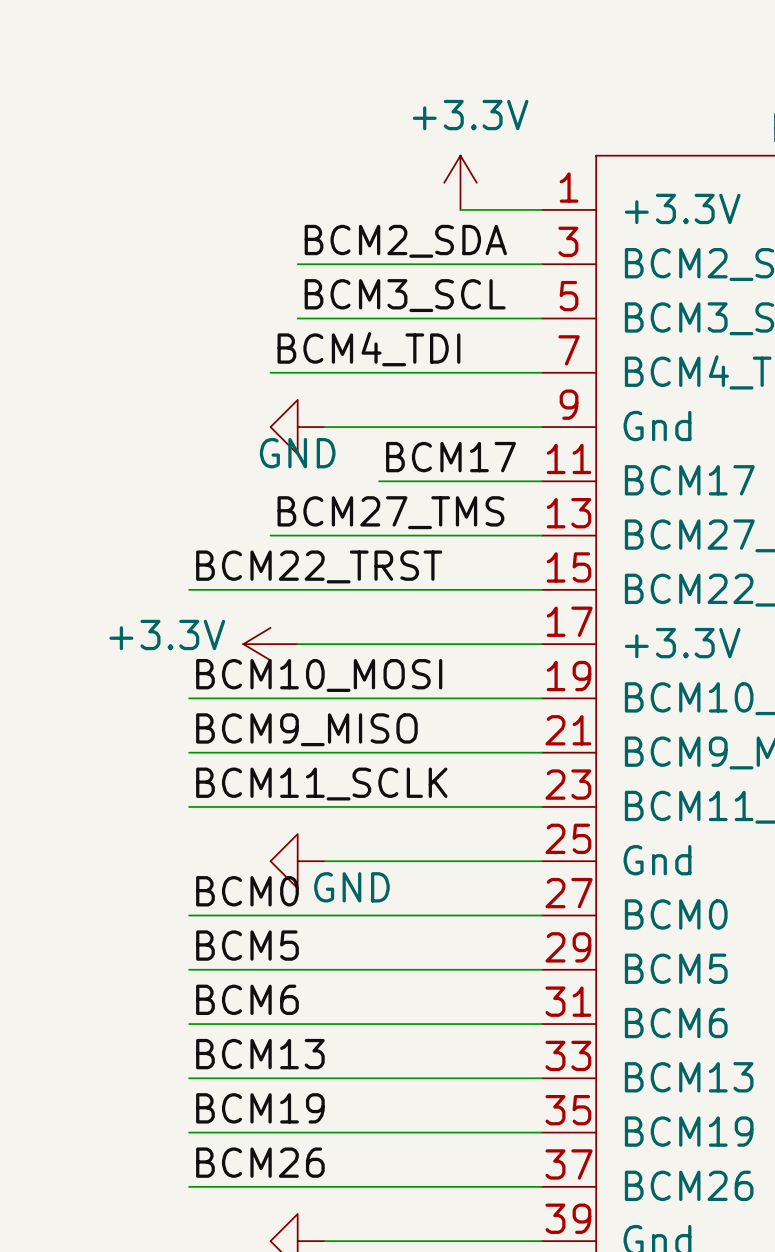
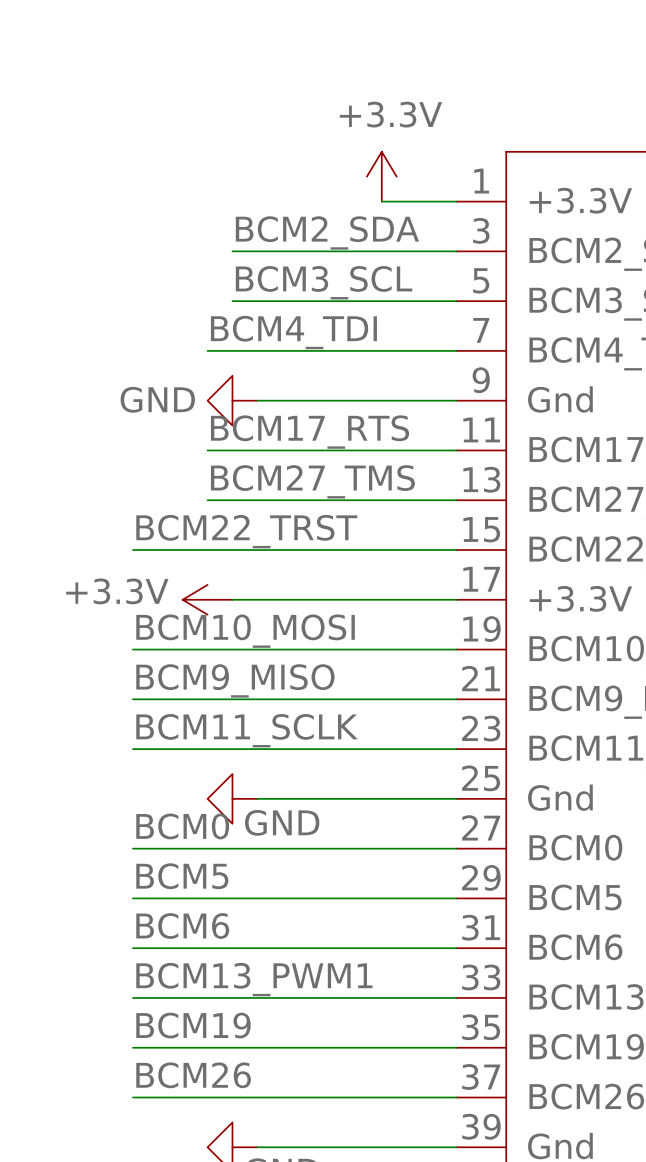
power symbol text position: GND (297, 453) -> GND (157, 399)
label: BCM17 (451, 457) -> BCM17_RTS (310, 432)
wire: none -> (207, 450) (307, 450)
label: BCM13 (260, 1054) -> BCM13_PWM1 (254, 979)

